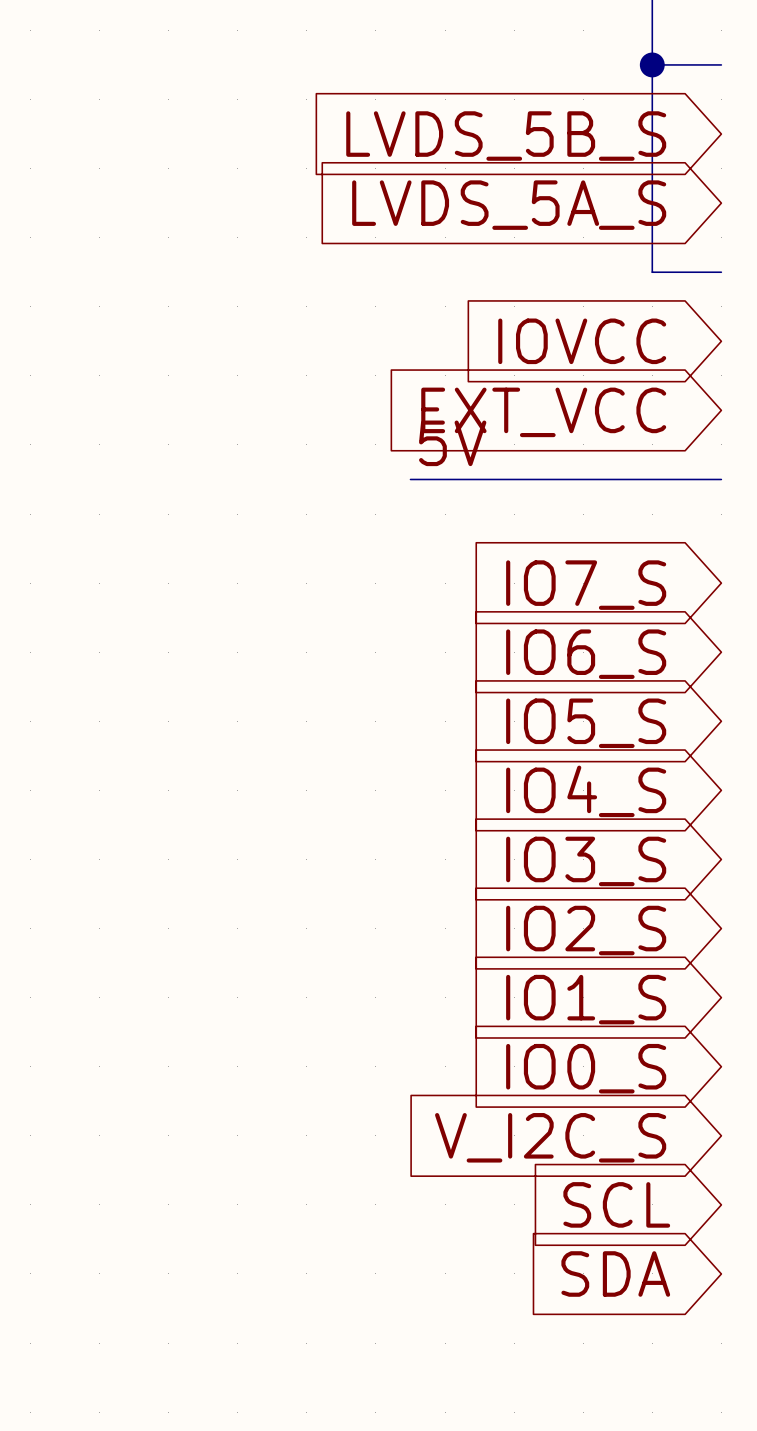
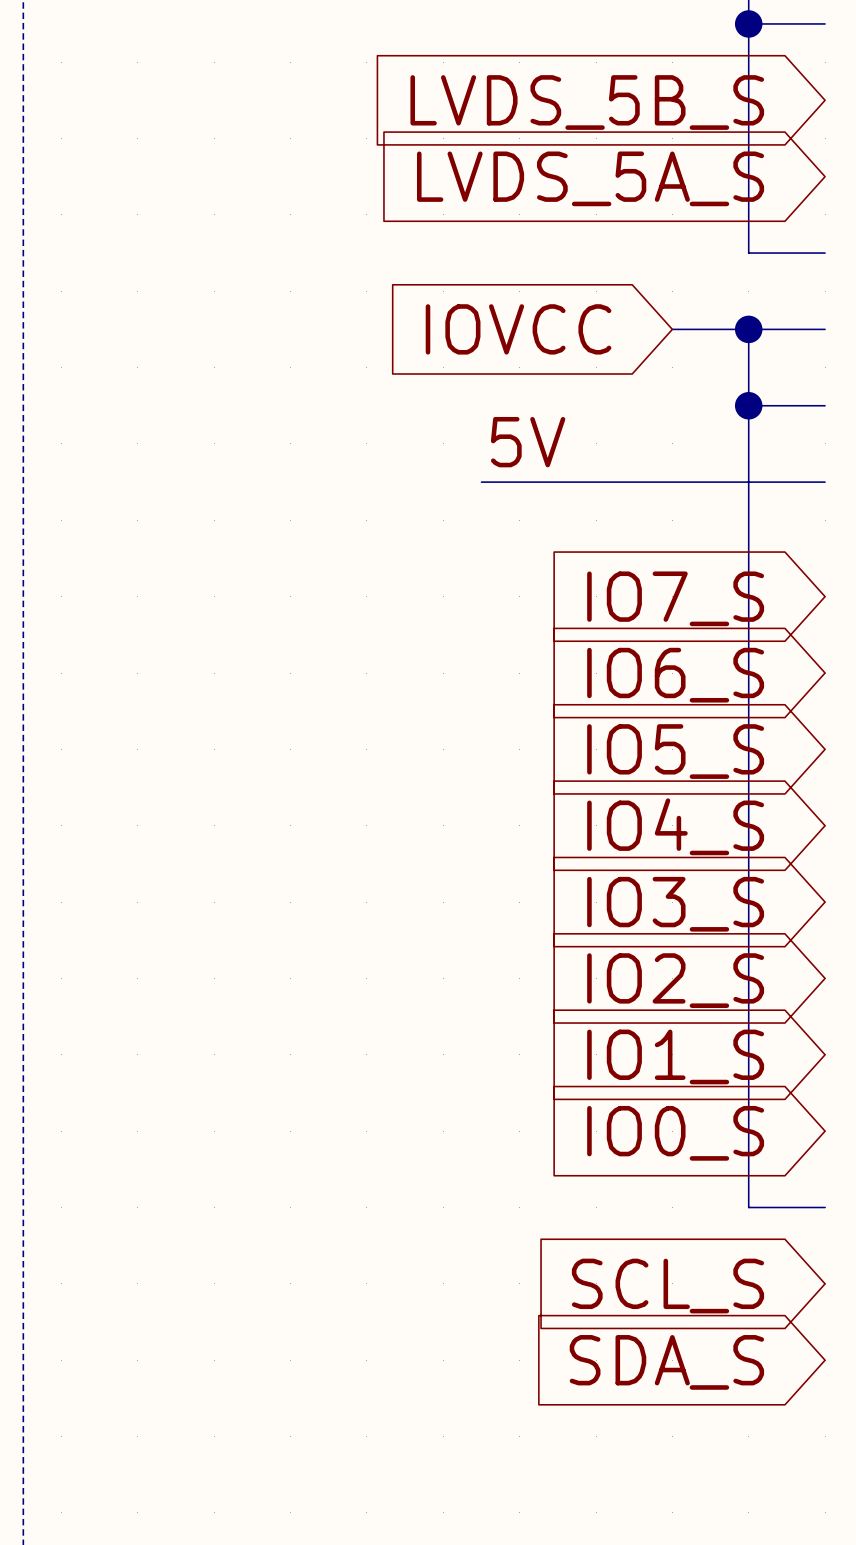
global label position: IOVCC (582, 341) -> IOVCC (518, 329)
wire: none -> (672, 329) (825, 329)
wire: none -> (748, 329) (748, 1207) (825, 1207)
junction: none -> (748, 329)
wire: none -> (748, 405) (825, 405)
junction: none -> (748, 405)
global label: EXT_VCC (543, 412) -> none
global label: V_I2C_S (550, 1137) -> none
global label: SCL (616, 1204) -> SCL_S (667, 1286)
global label: SDA (615, 1273) -> SDA_S (666, 1362)

